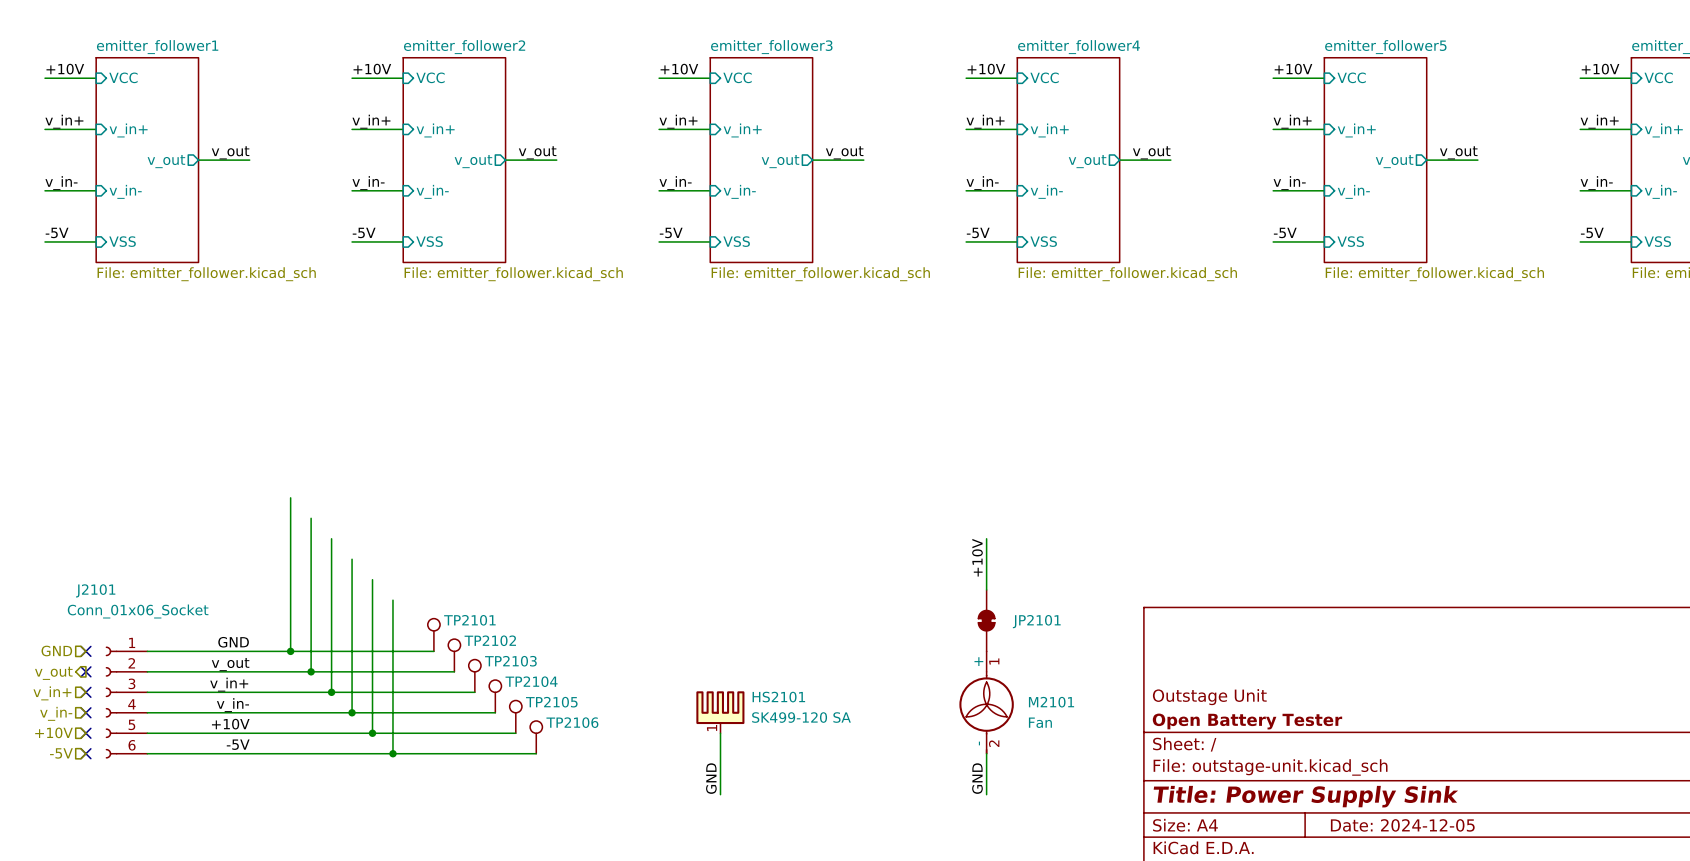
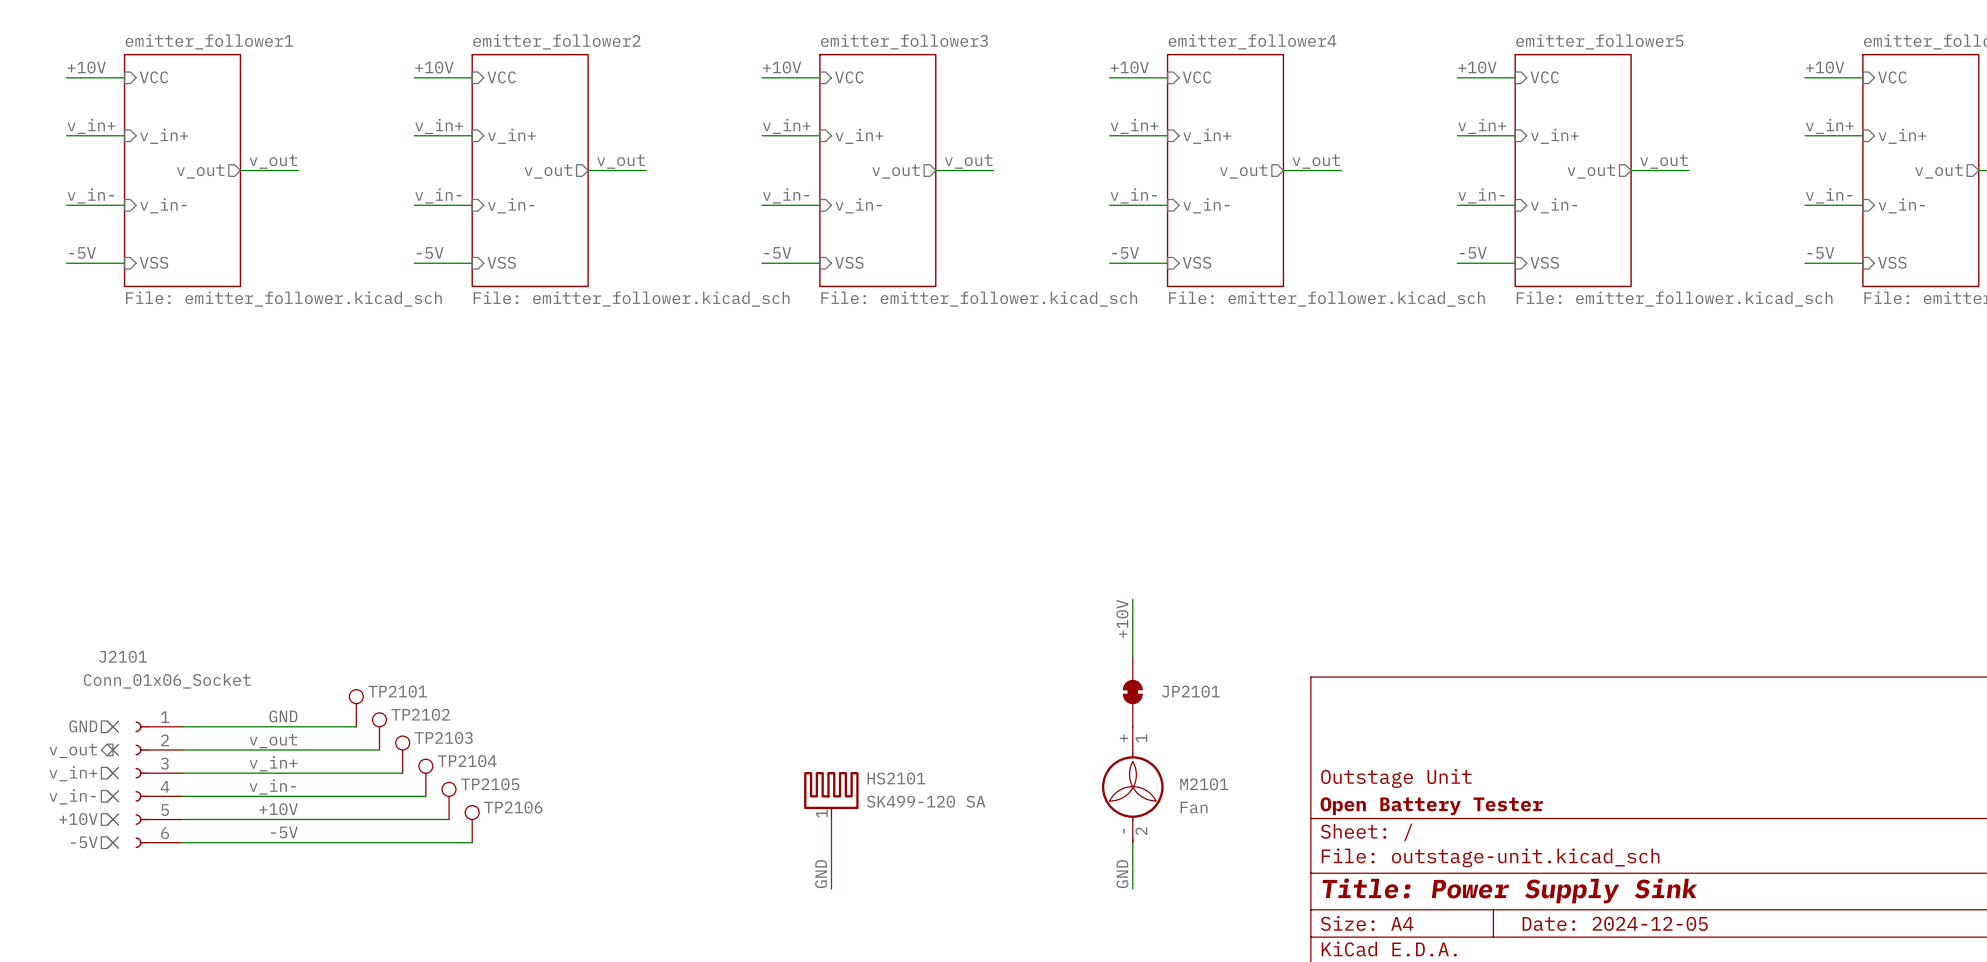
wire: (290, 497) (290, 651) -> none
wire: (311, 518) (311, 671) -> none
wire: (331, 538) (331, 692) -> none
wire: (352, 559) (352, 712) -> none
wire: (372, 579) (372, 733) -> none
wire: (392, 600) (392, 753) -> none
TP2101 position: (433, 635) -> (356, 708)
junction: (290, 651) -> none
wire: (300, 651) (433, 651) -> none
TP2102 position: (454, 655) -> (379, 731)
junction: (311, 671) -> none
wire: (321, 671) (454, 671) -> none
TP2103 position: (474, 675) -> (402, 754)
junction: (331, 692) -> none
wire: (341, 692) (474, 692) -> none
TP2104 position: (495, 696) -> (425, 777)
junction: (352, 712) -> none
wire: (362, 712) (495, 712) -> none
TP2105 position: (515, 716) -> (449, 800)
junction: (372, 733) -> none
wire: (382, 733) (515, 733) -> none
TP2106 position: (536, 737) -> (472, 824)
junction: (392, 753) -> none
wire: (403, 753) (536, 753) -> none

